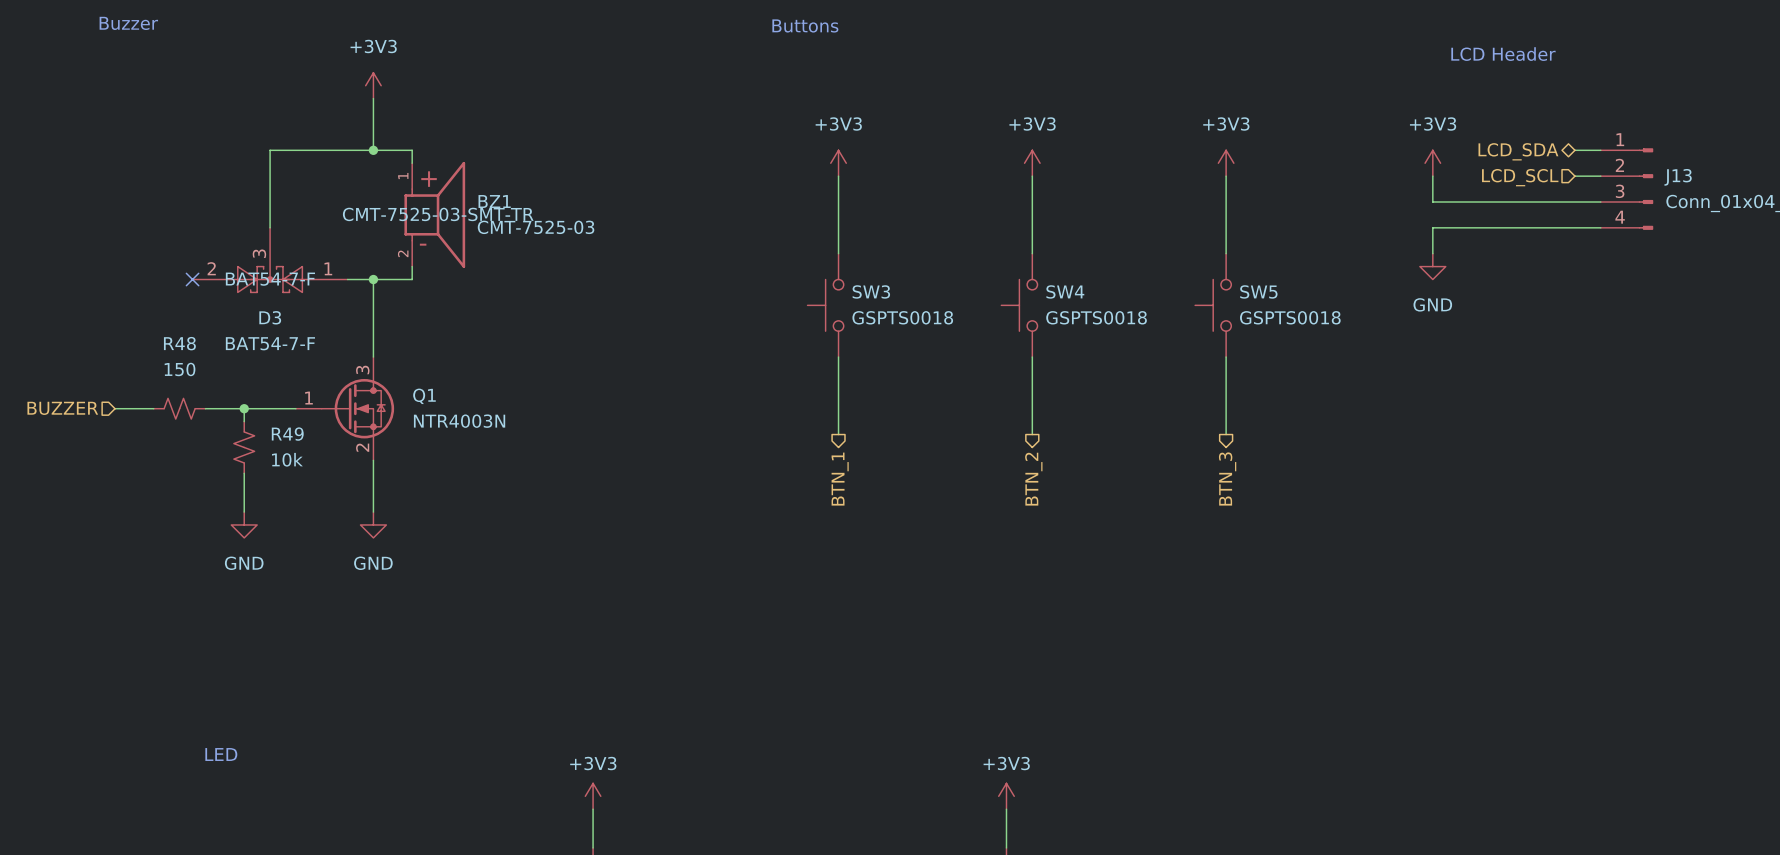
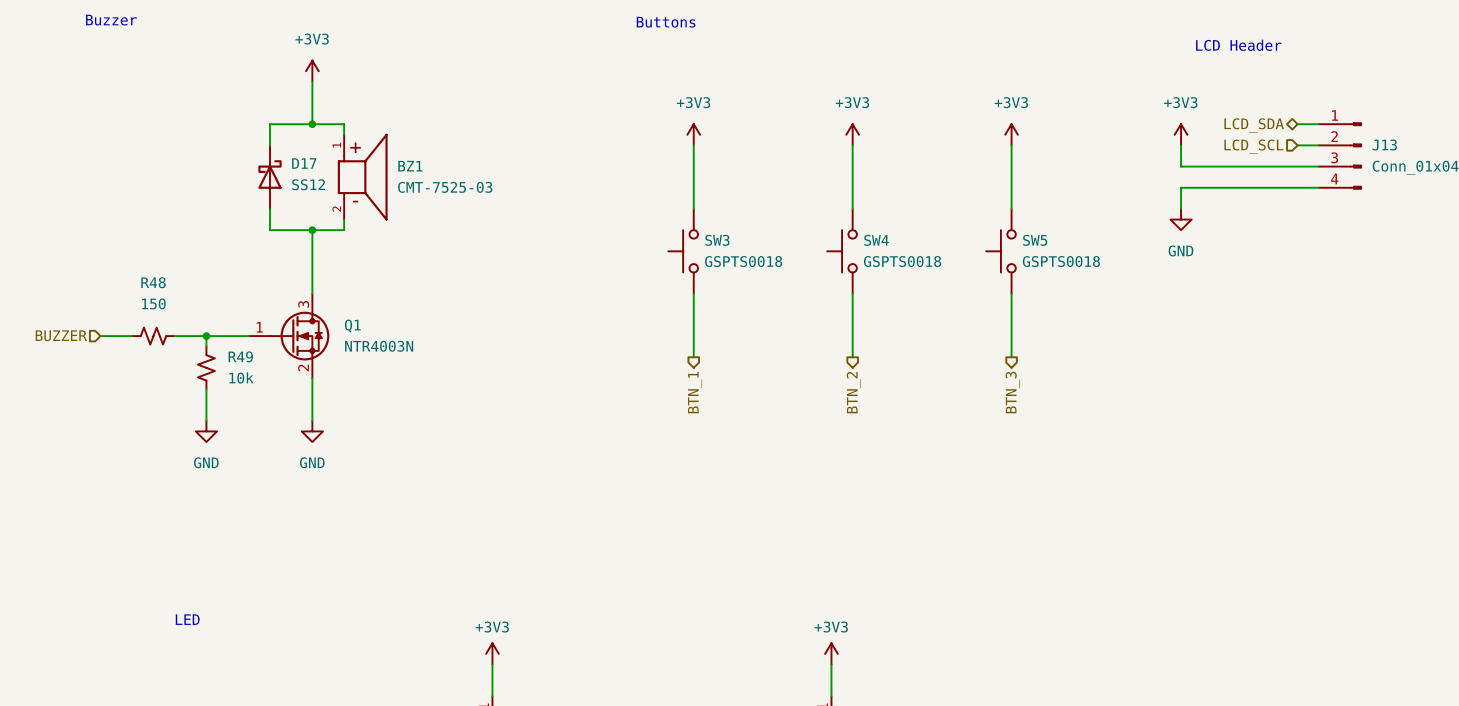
wire: (321, 150) (270, 150) (270, 227) -> (269, 124) (269, 145)
D17: none -> SS12 (269, 177)
BZ1 text: CMT-7525-03-SMT-TR (438, 214) -> none
wire: none -> (269, 208) (269, 230) (291, 230)
D3: BAT54-7-F (270, 260) -> none
no-connect mark: (192, 279) -> none

